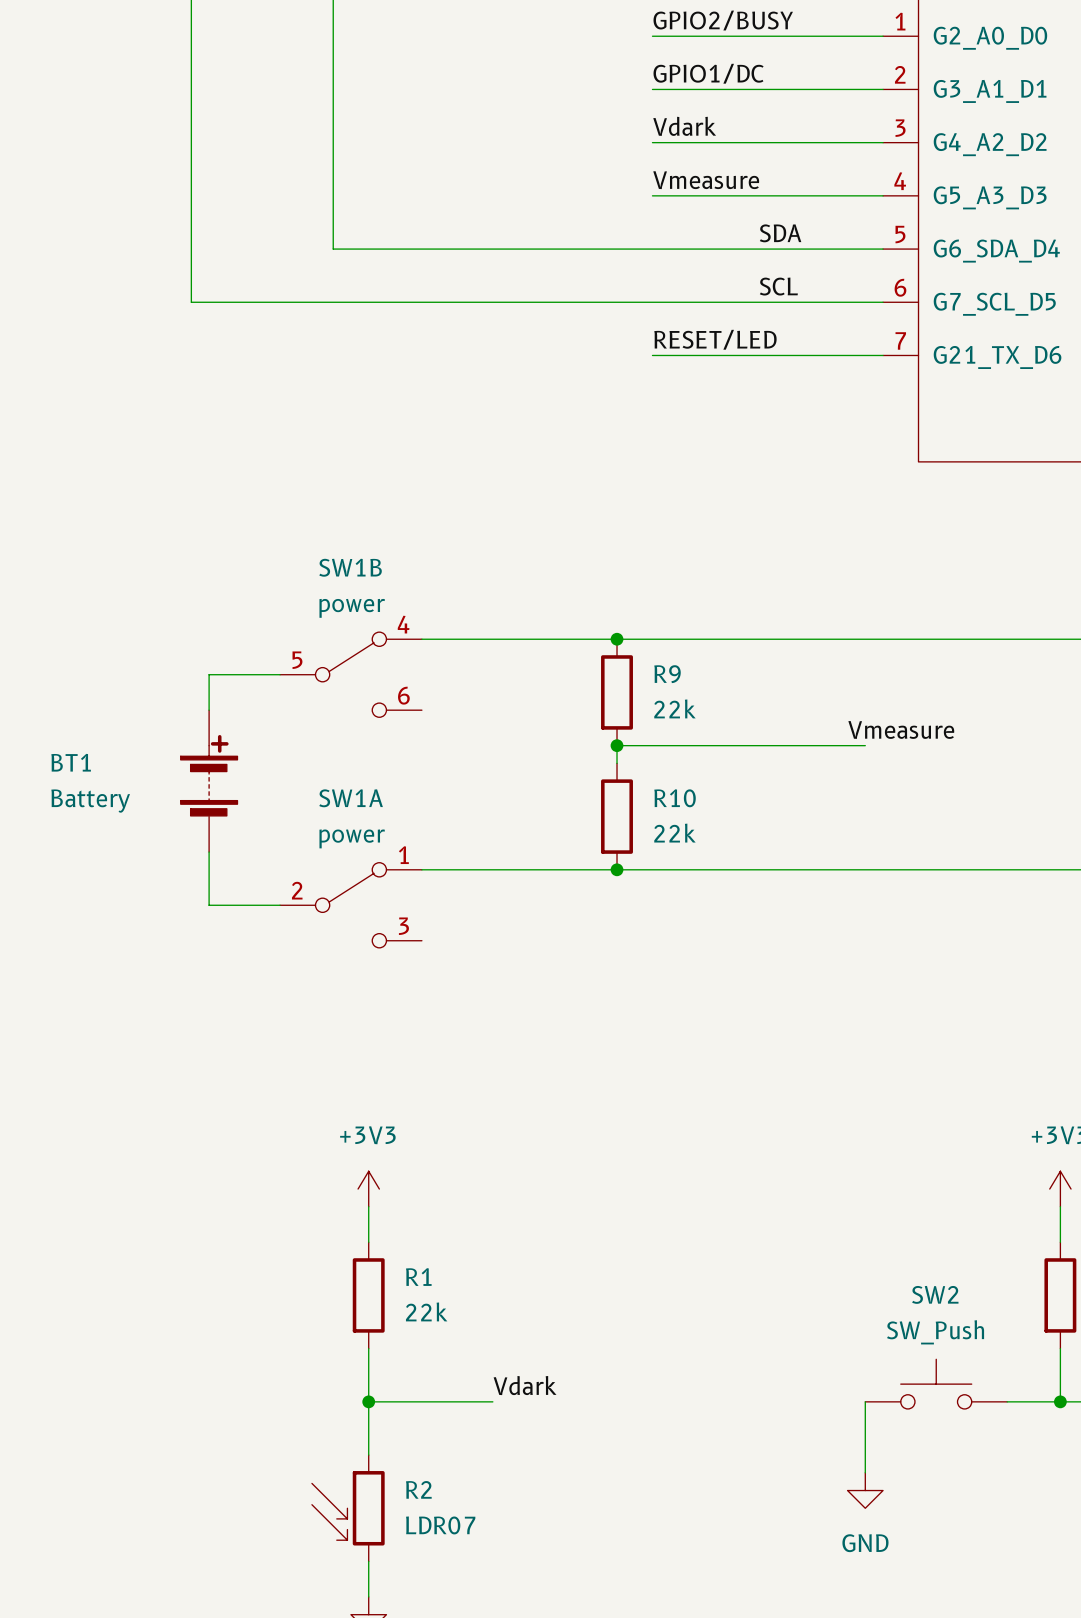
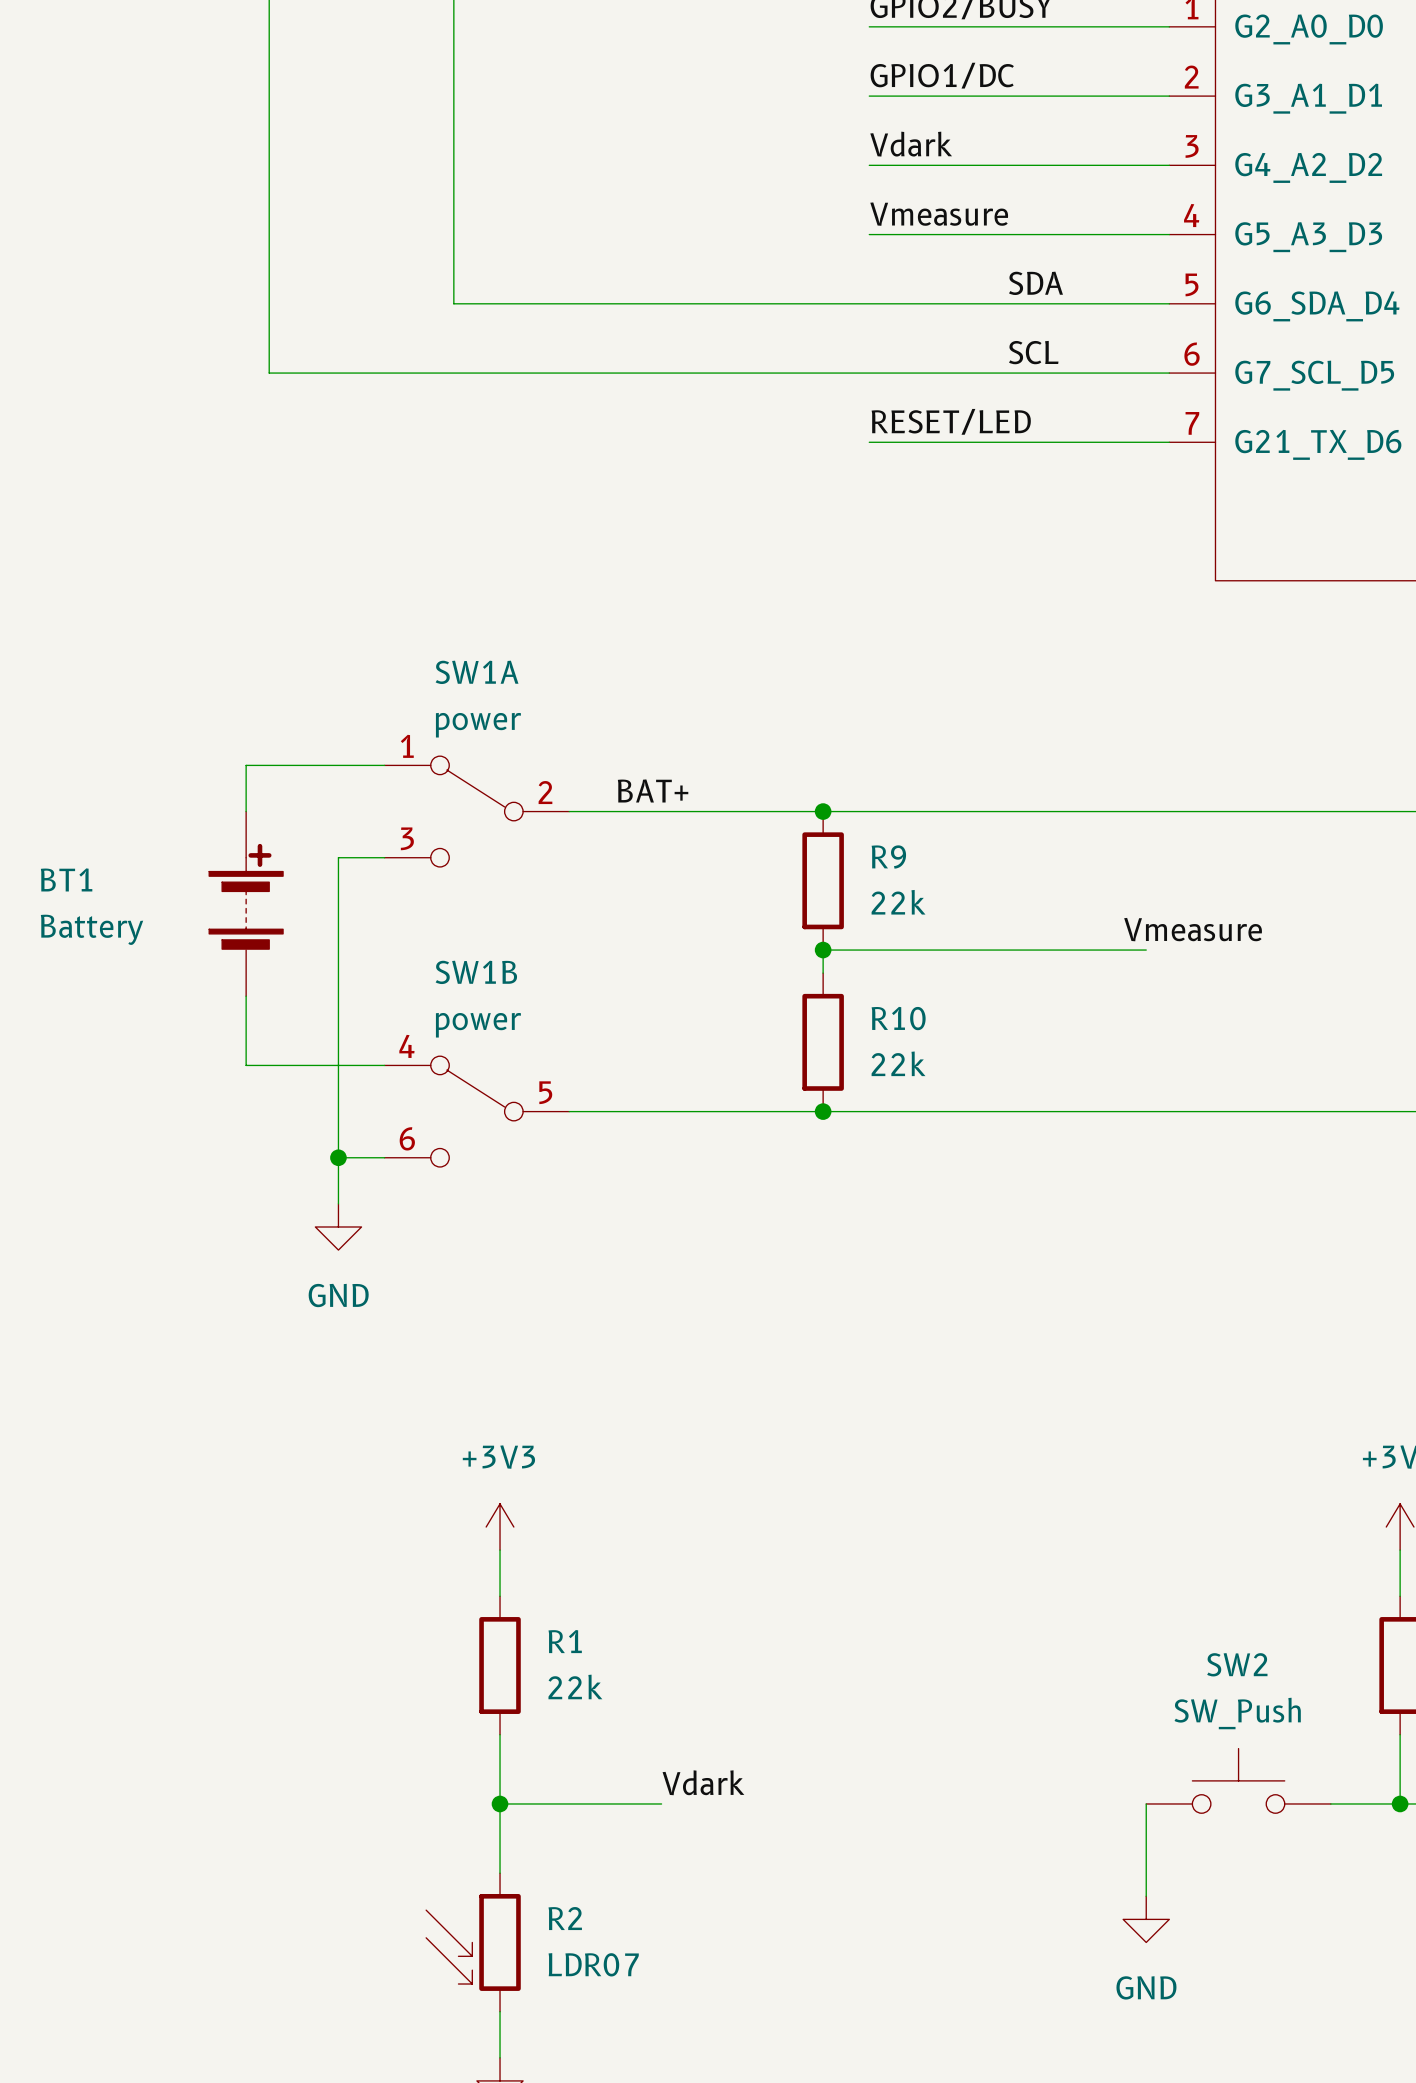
wire: none -> (384, 765) (246, 765) (246, 811)
label: none -> BAT+ (653, 790)
wire: (244, 674) (209, 674) (209, 710) -> (338, 857) (338, 1203)
SW1B flip: as is (350, 674) -> left-right (476, 1111)
SW1B position: (350, 674) -> (476, 1111)
wire: none -> (246, 996) (246, 1065) (384, 1065)
BT1 position: (209, 781) -> (246, 903)
wire: (209, 852) (209, 905) (244, 905) -> none
junction: none -> (338, 1157)
SW1A flip: as is (350, 905) -> left-right (476, 811)
SW1A position: (350, 905) -> (476, 811)
power symbol: none -> GND (338, 1226)

